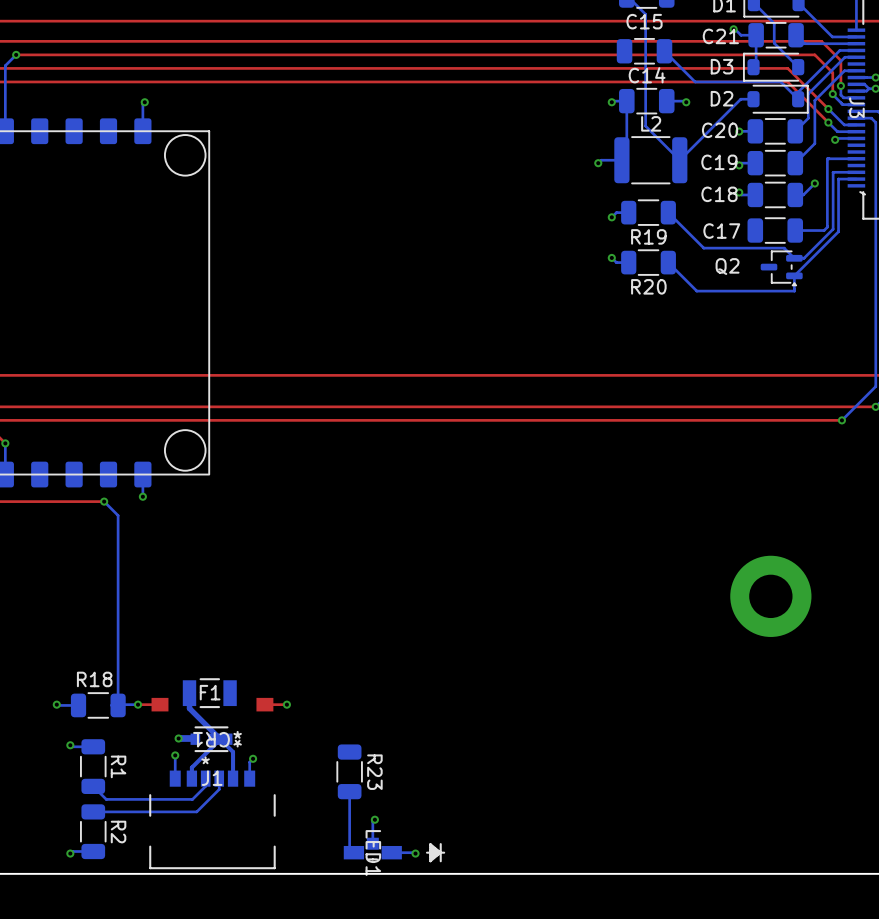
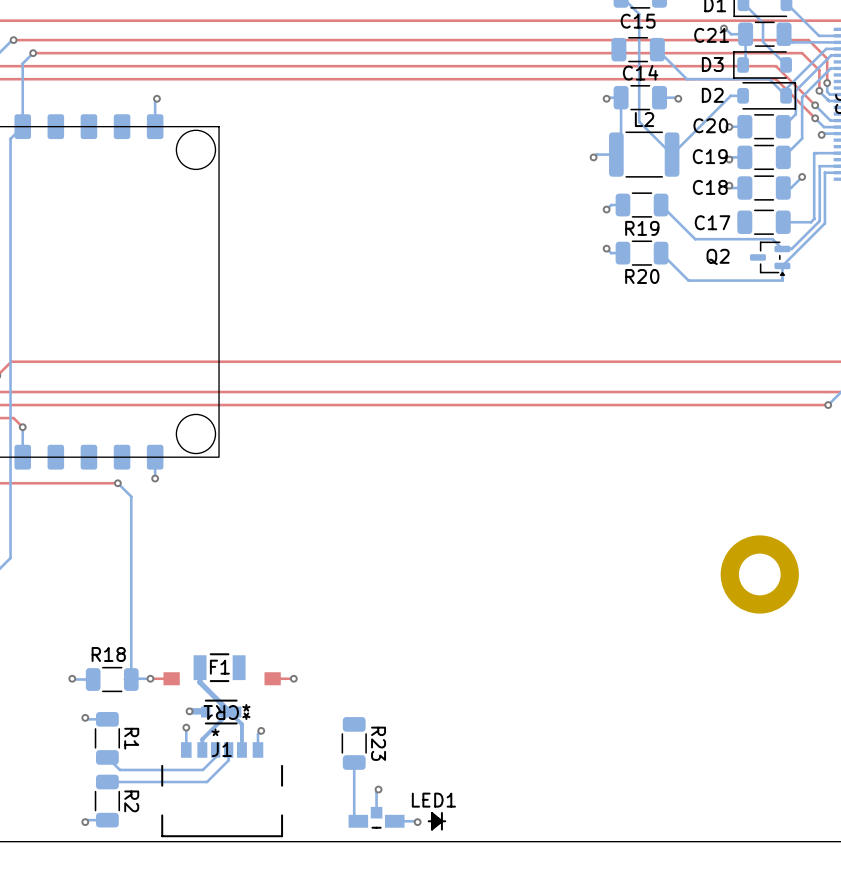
LED1 name rotation: 0° (373, 853) -> 90° counterclockwise (433, 800)
LED1 name position: LED1 (373, 853) -> LED1 (433, 800)

